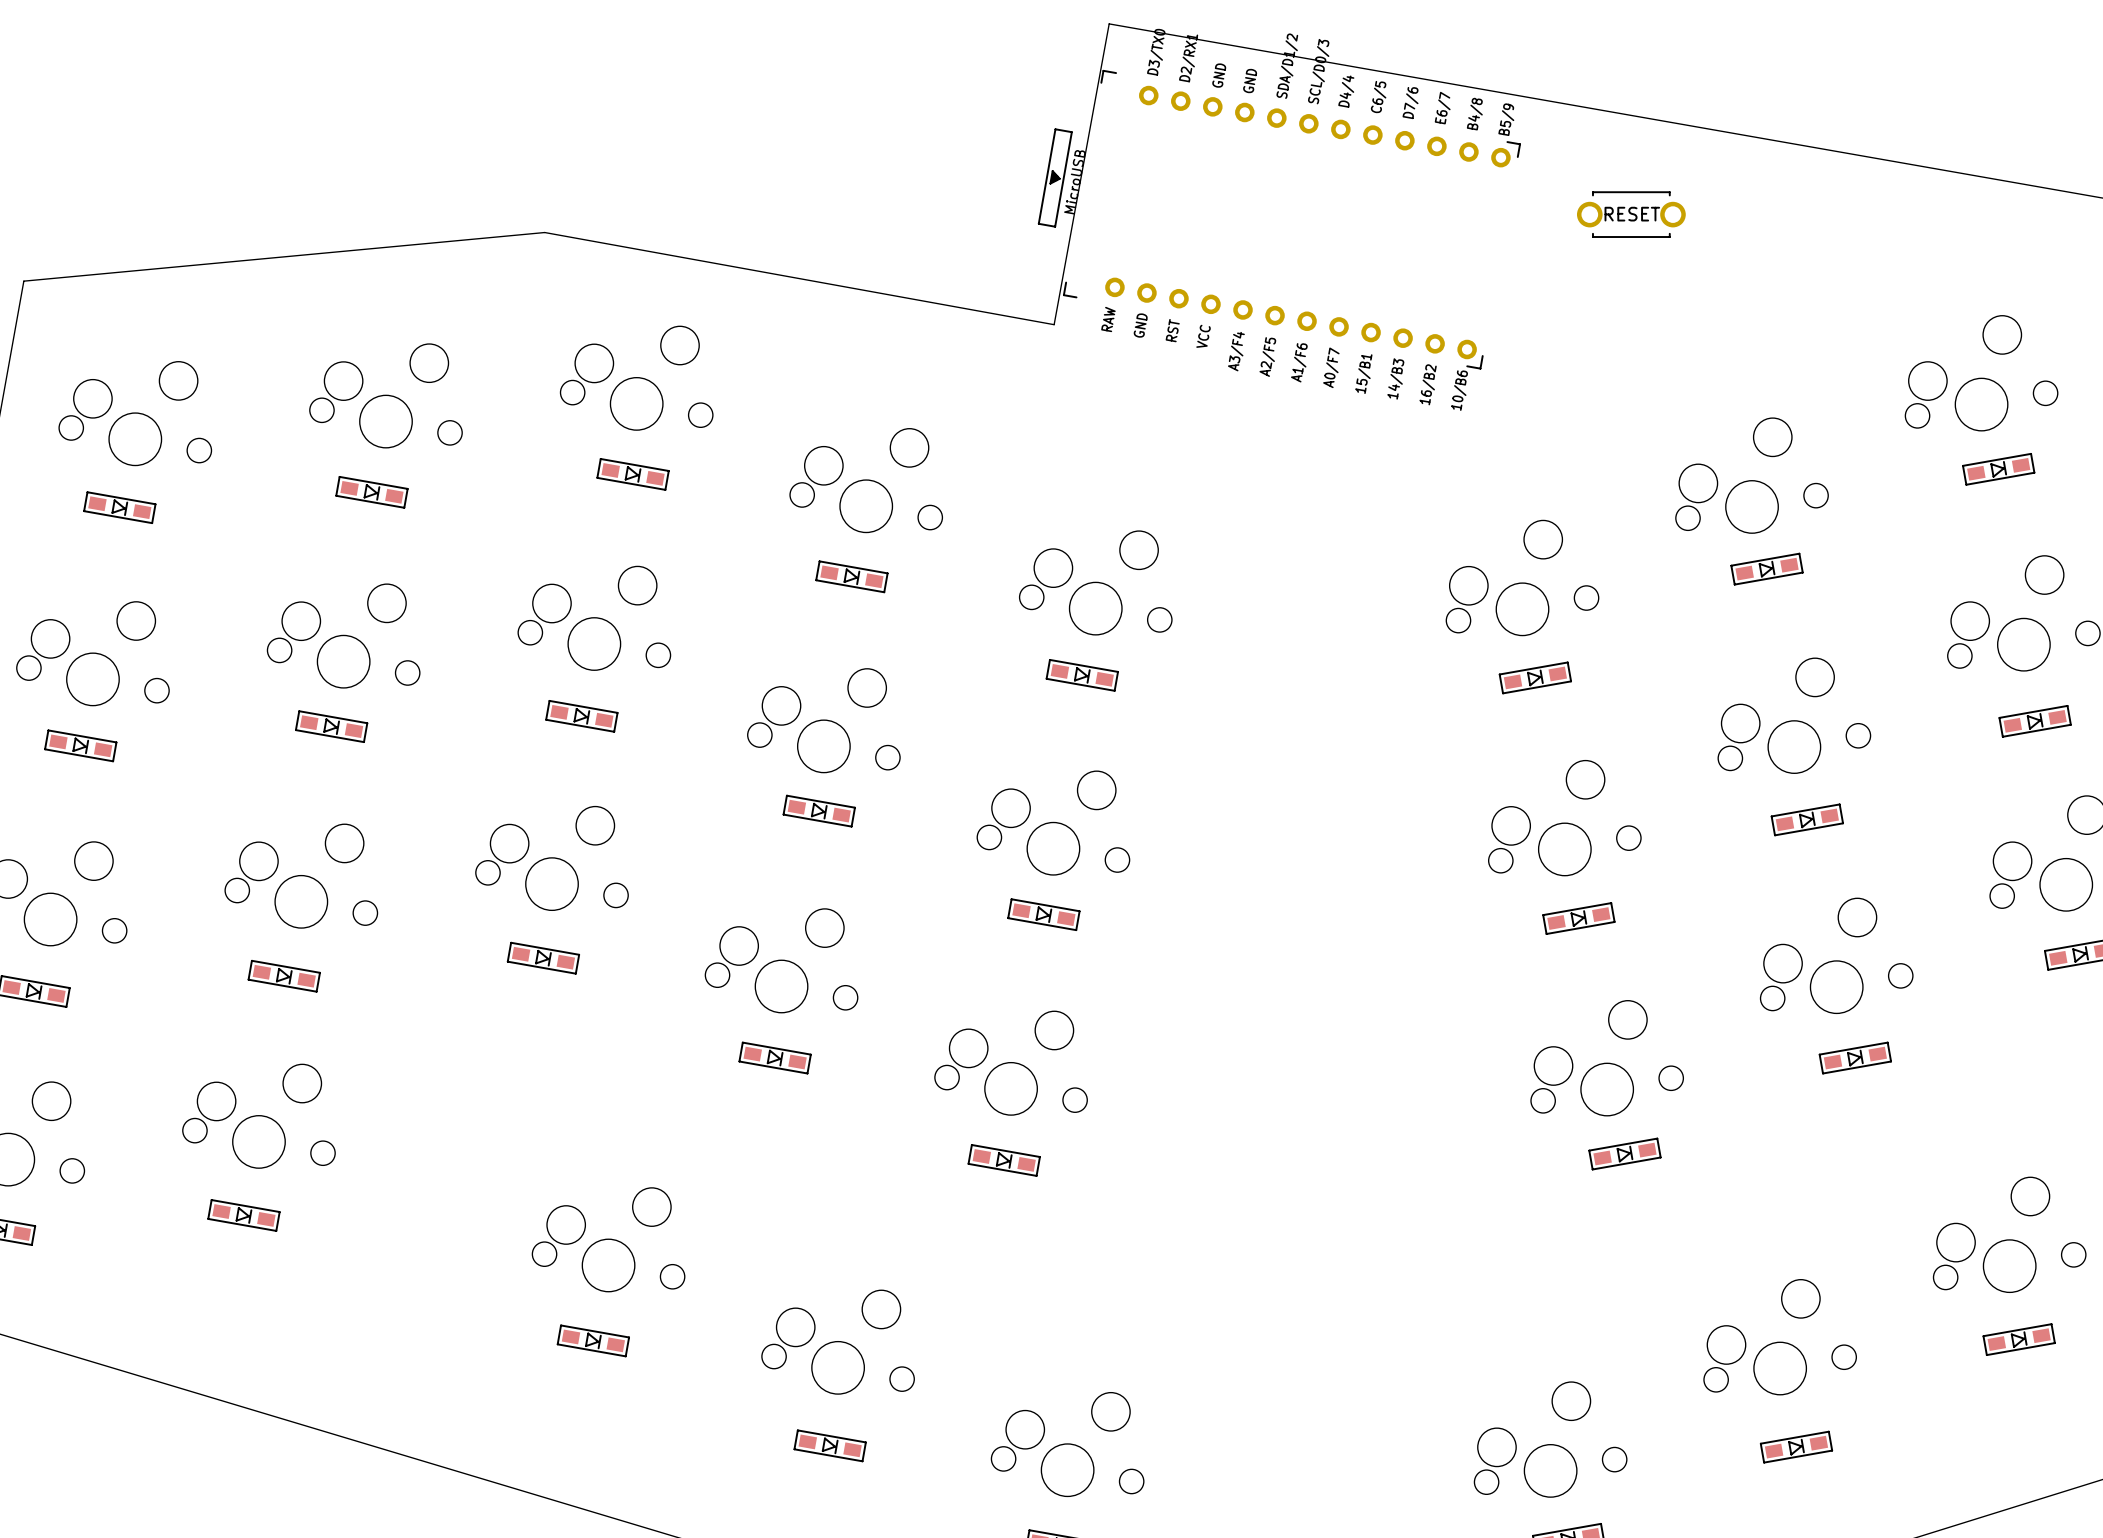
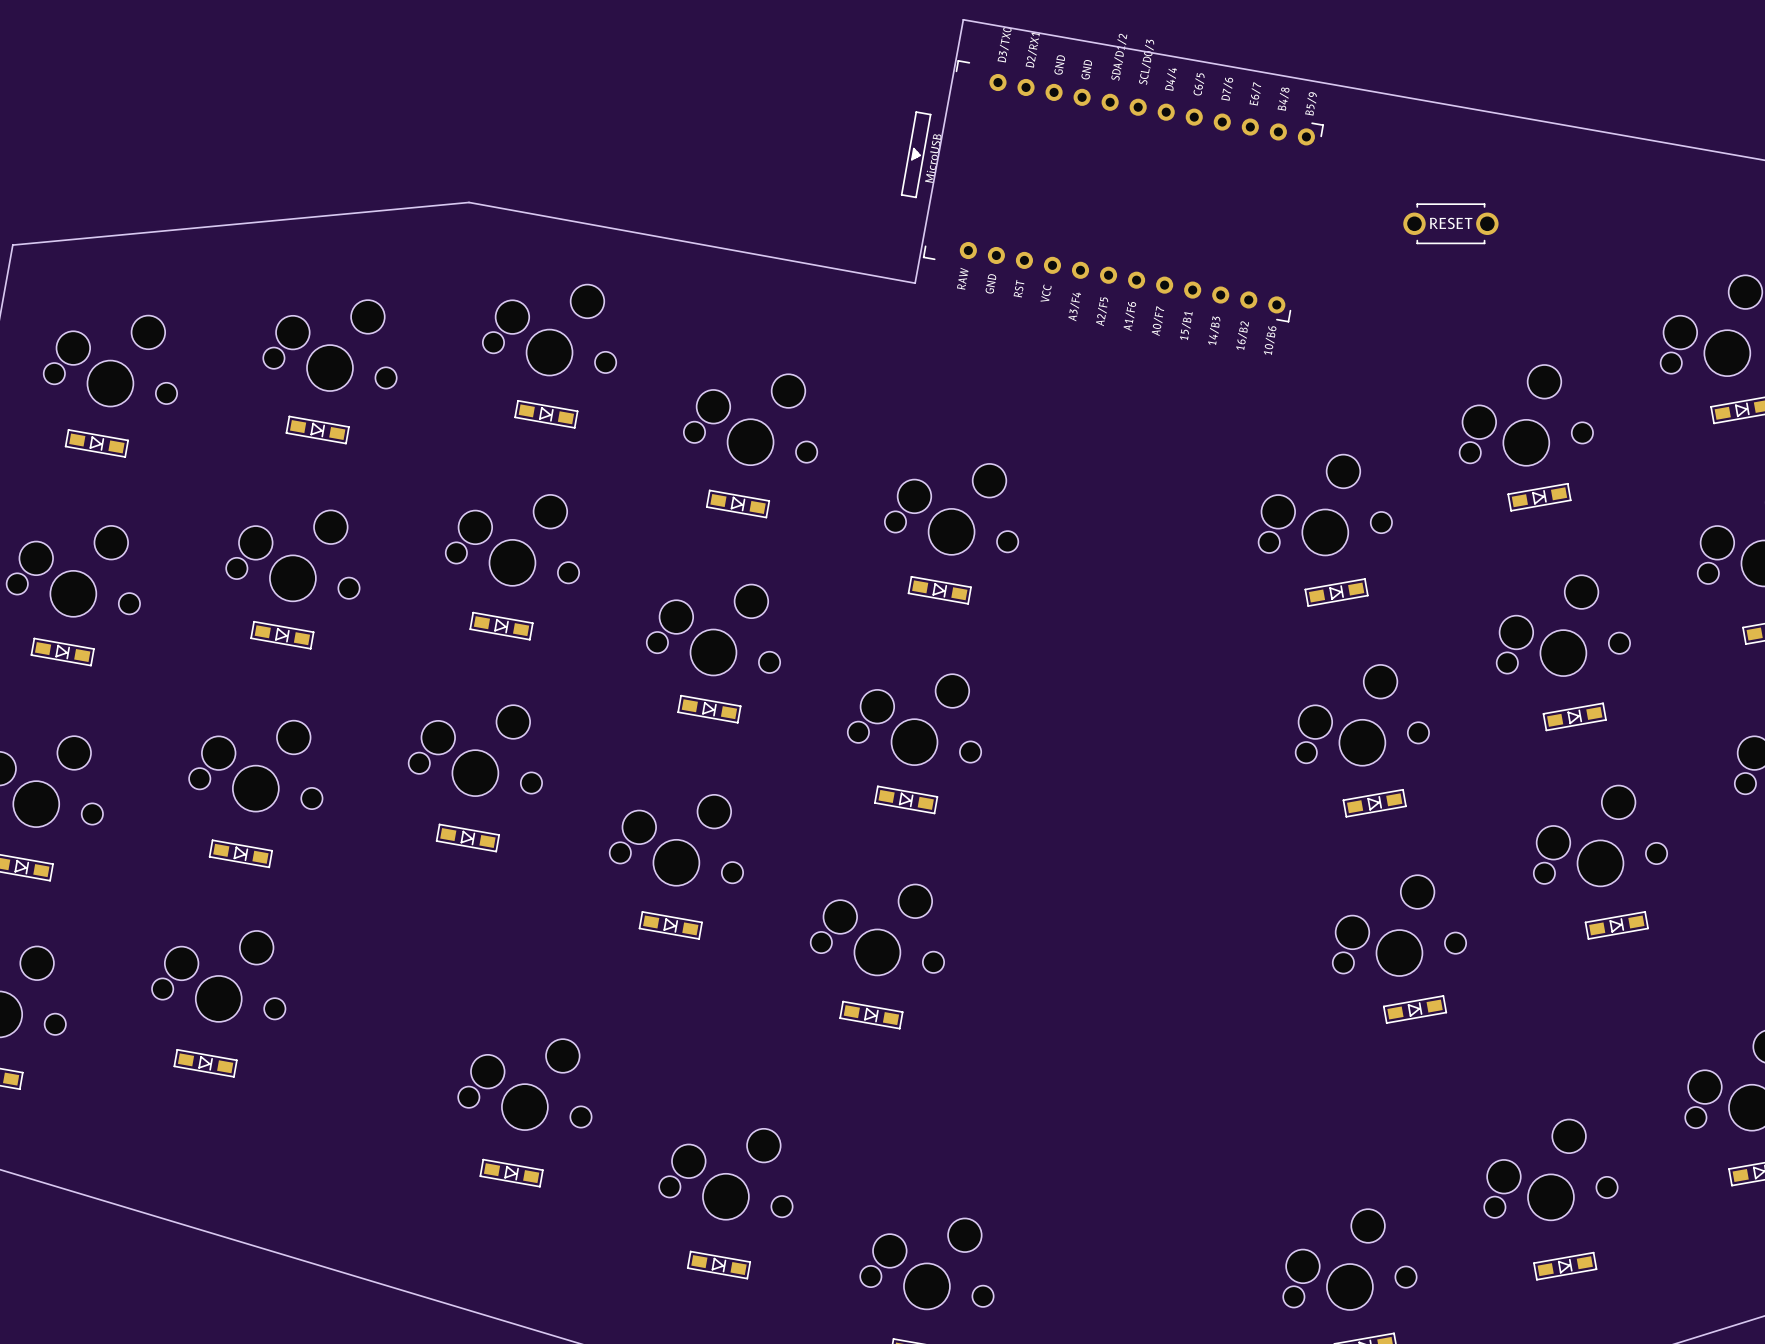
part position: (1631, 214) -> (1450, 223)

